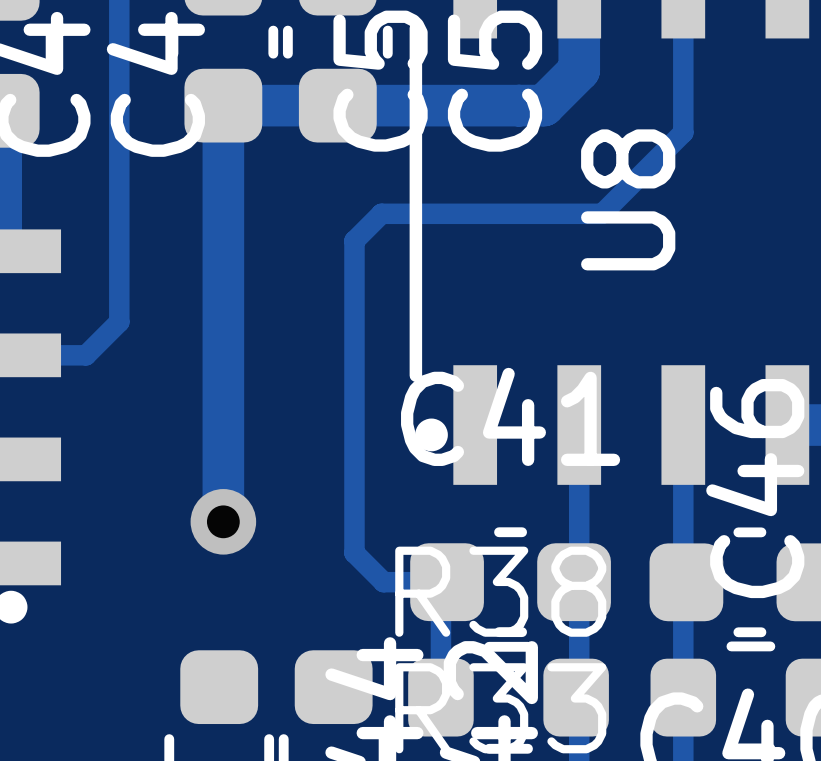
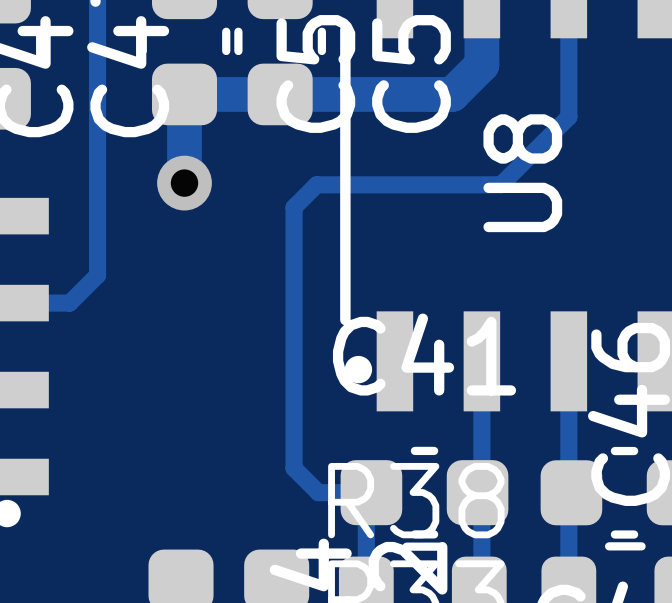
track: (223, 211) (223, 521) -> none
via: none -> (184, 183)
via: (223, 521) -> none

